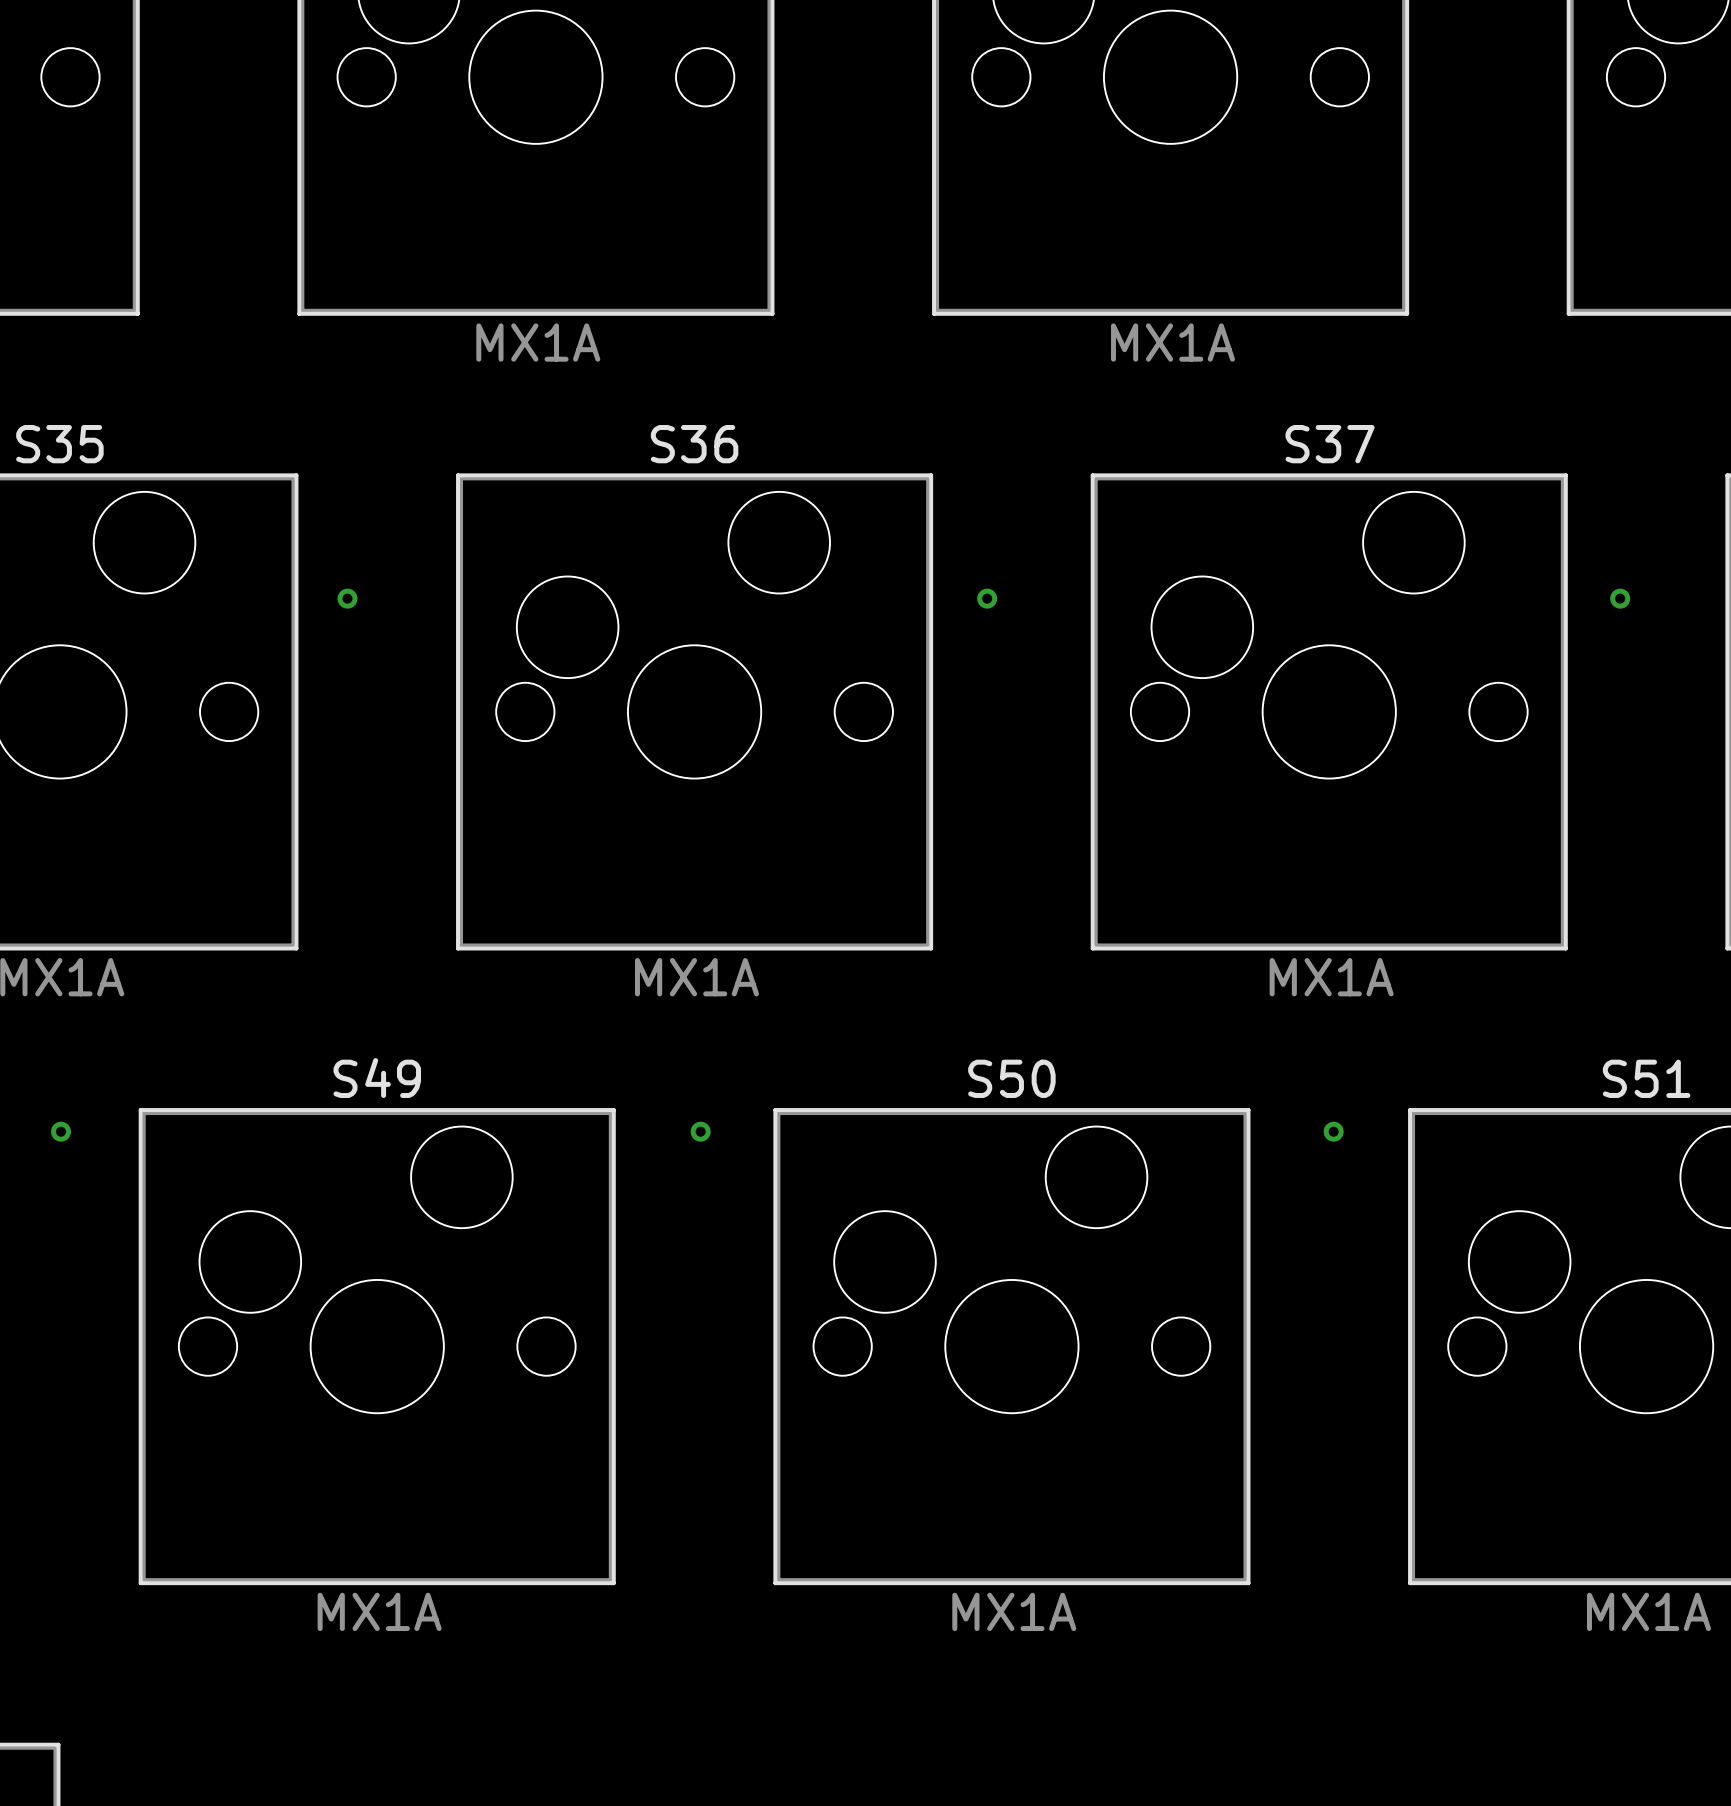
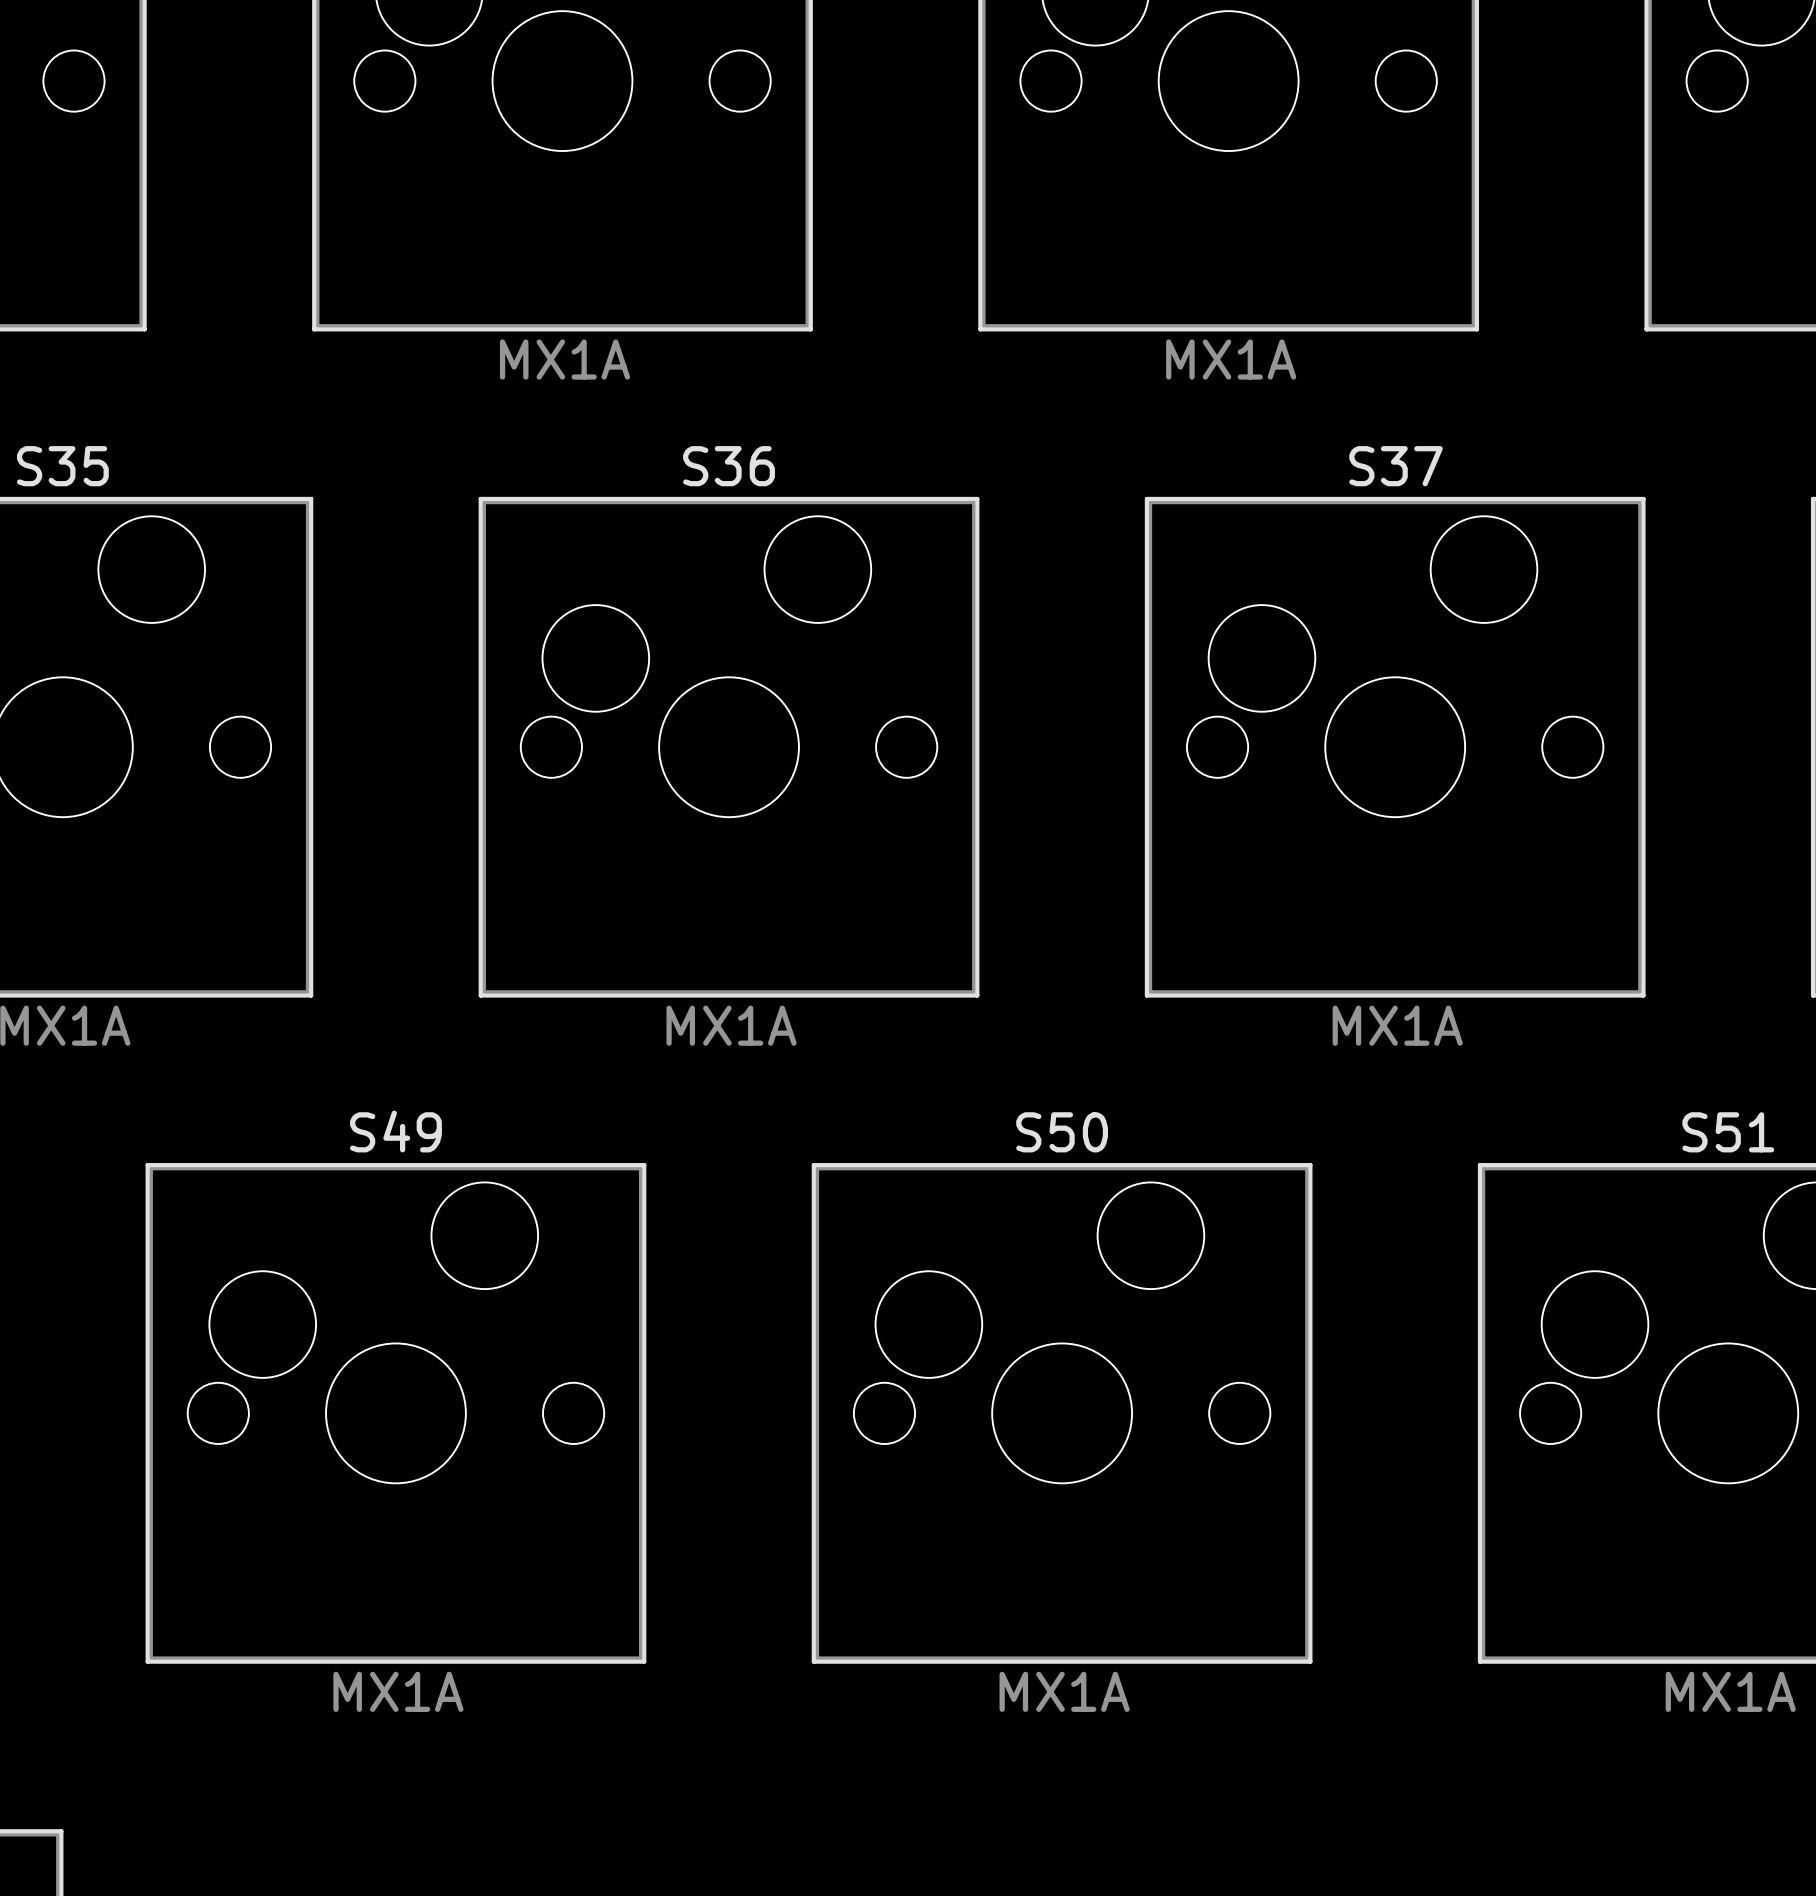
via: (347, 598) -> none
via: (987, 598) -> none
via: (1620, 598) -> none
via: (60, 1131) -> none
via: (700, 1131) -> none
via: (1333, 1131) -> none

